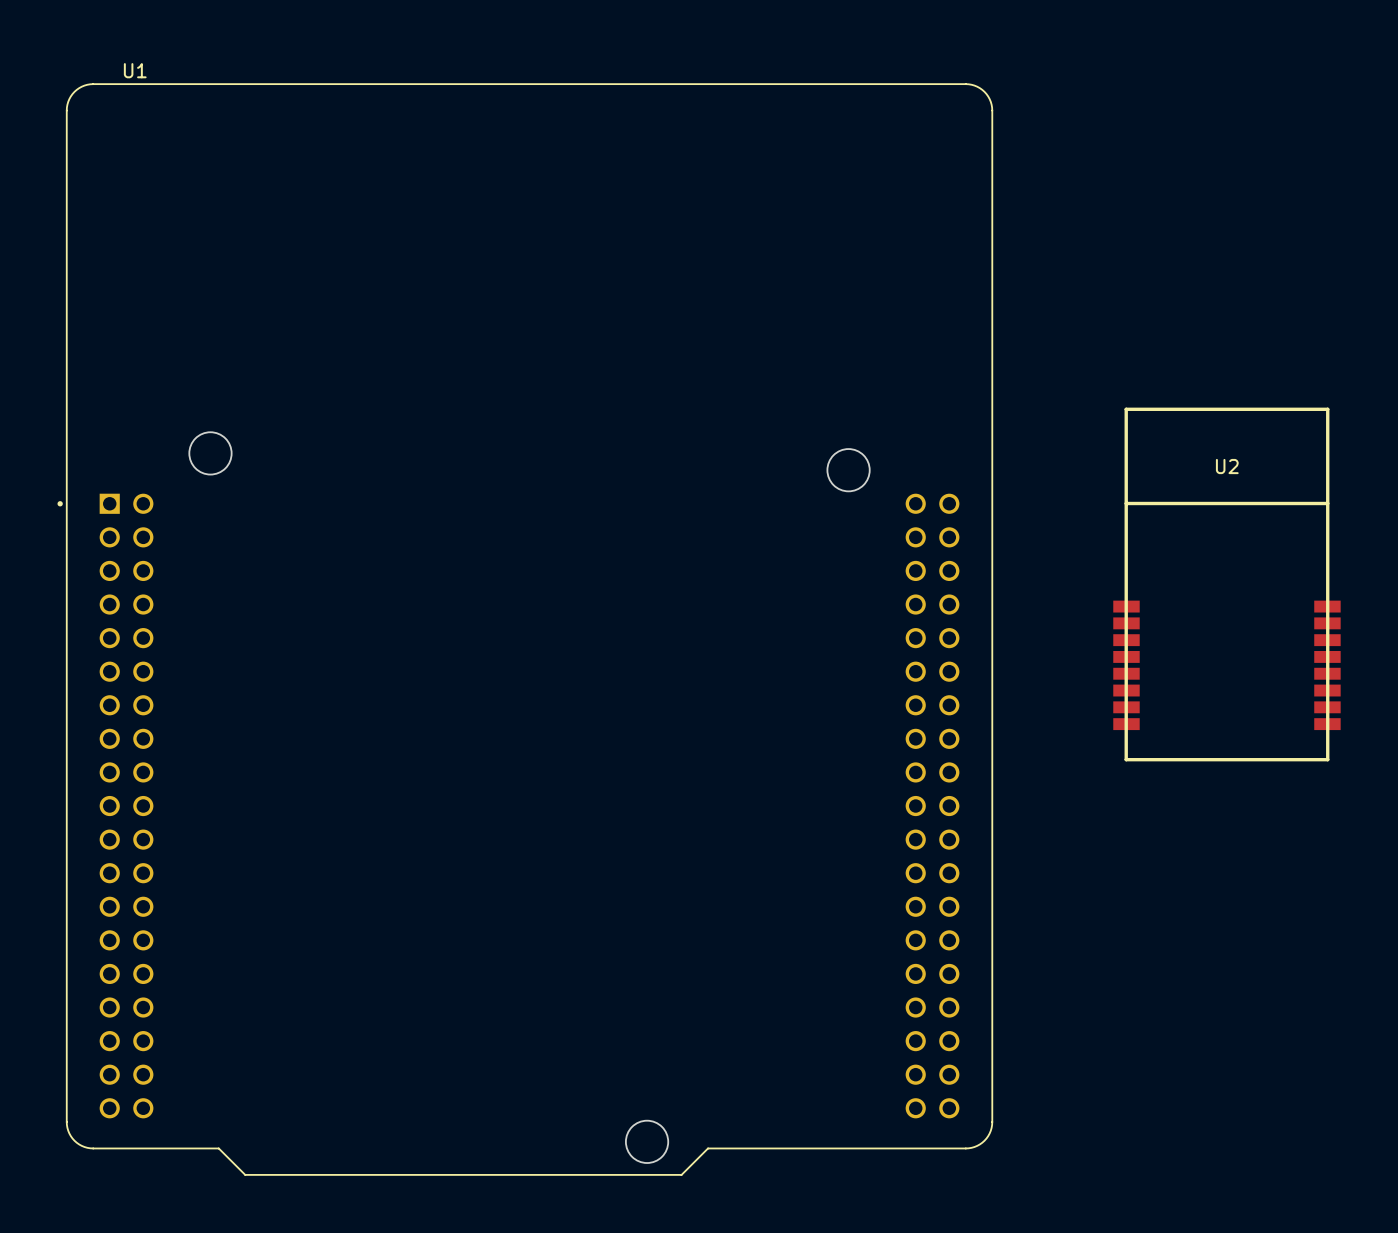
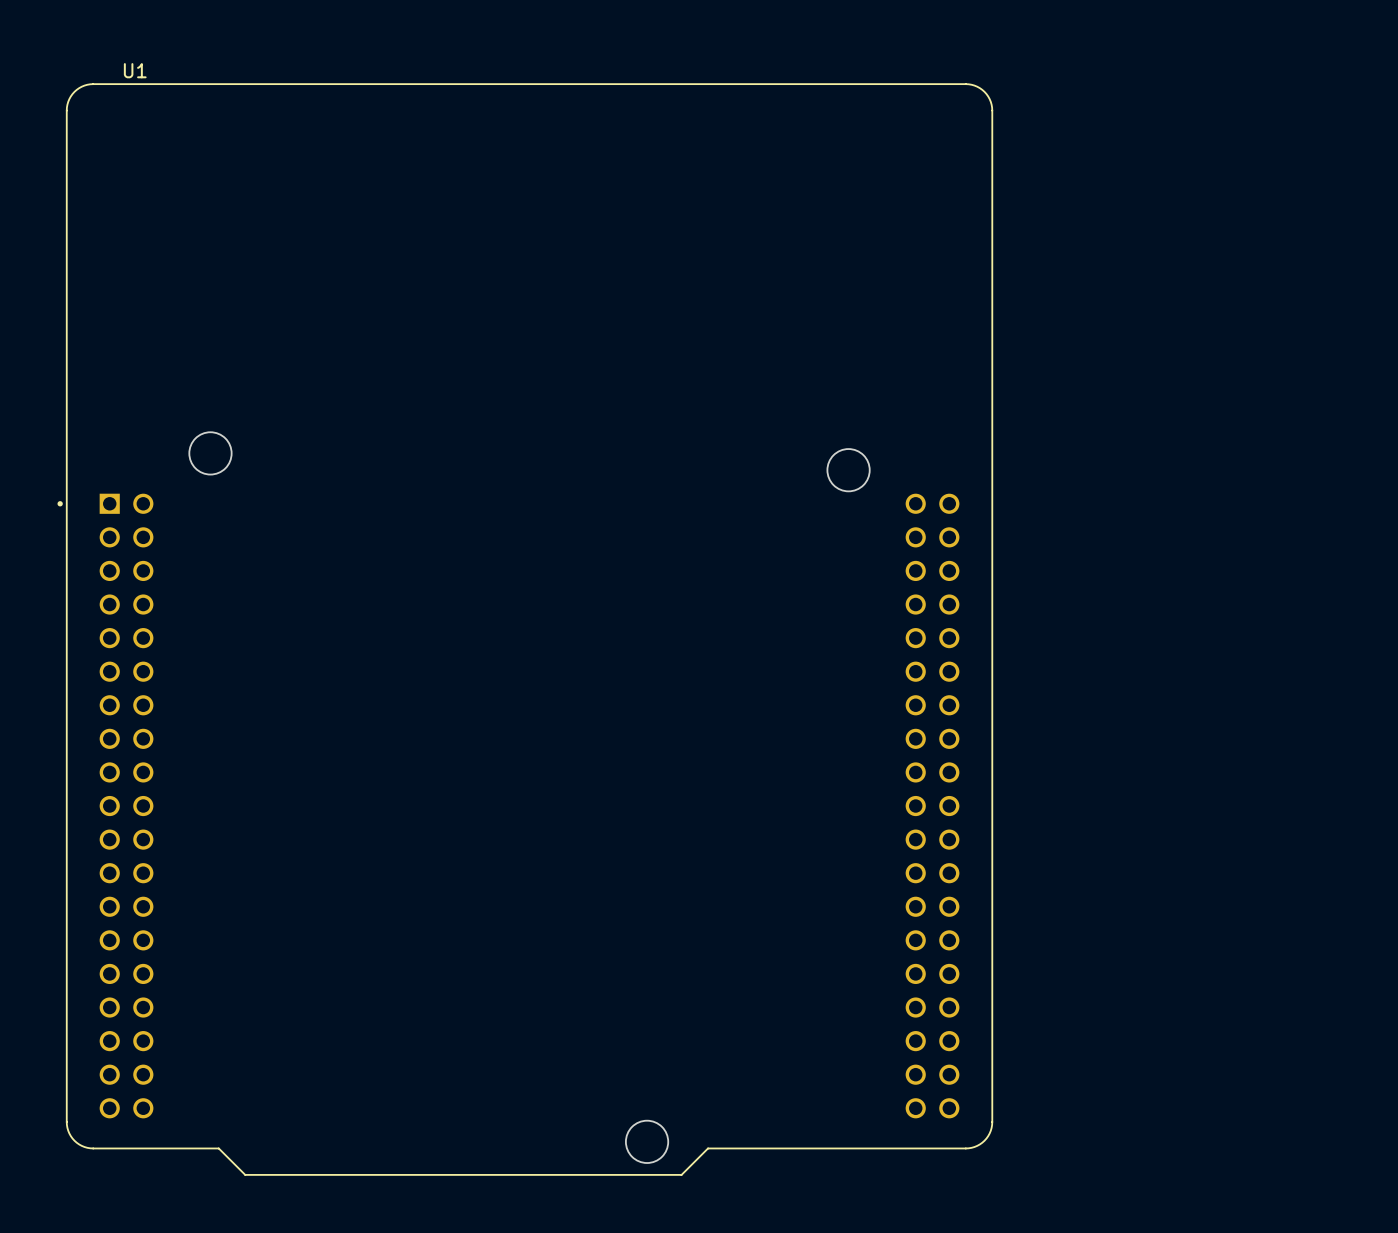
U2: (1226, 584) -> none

